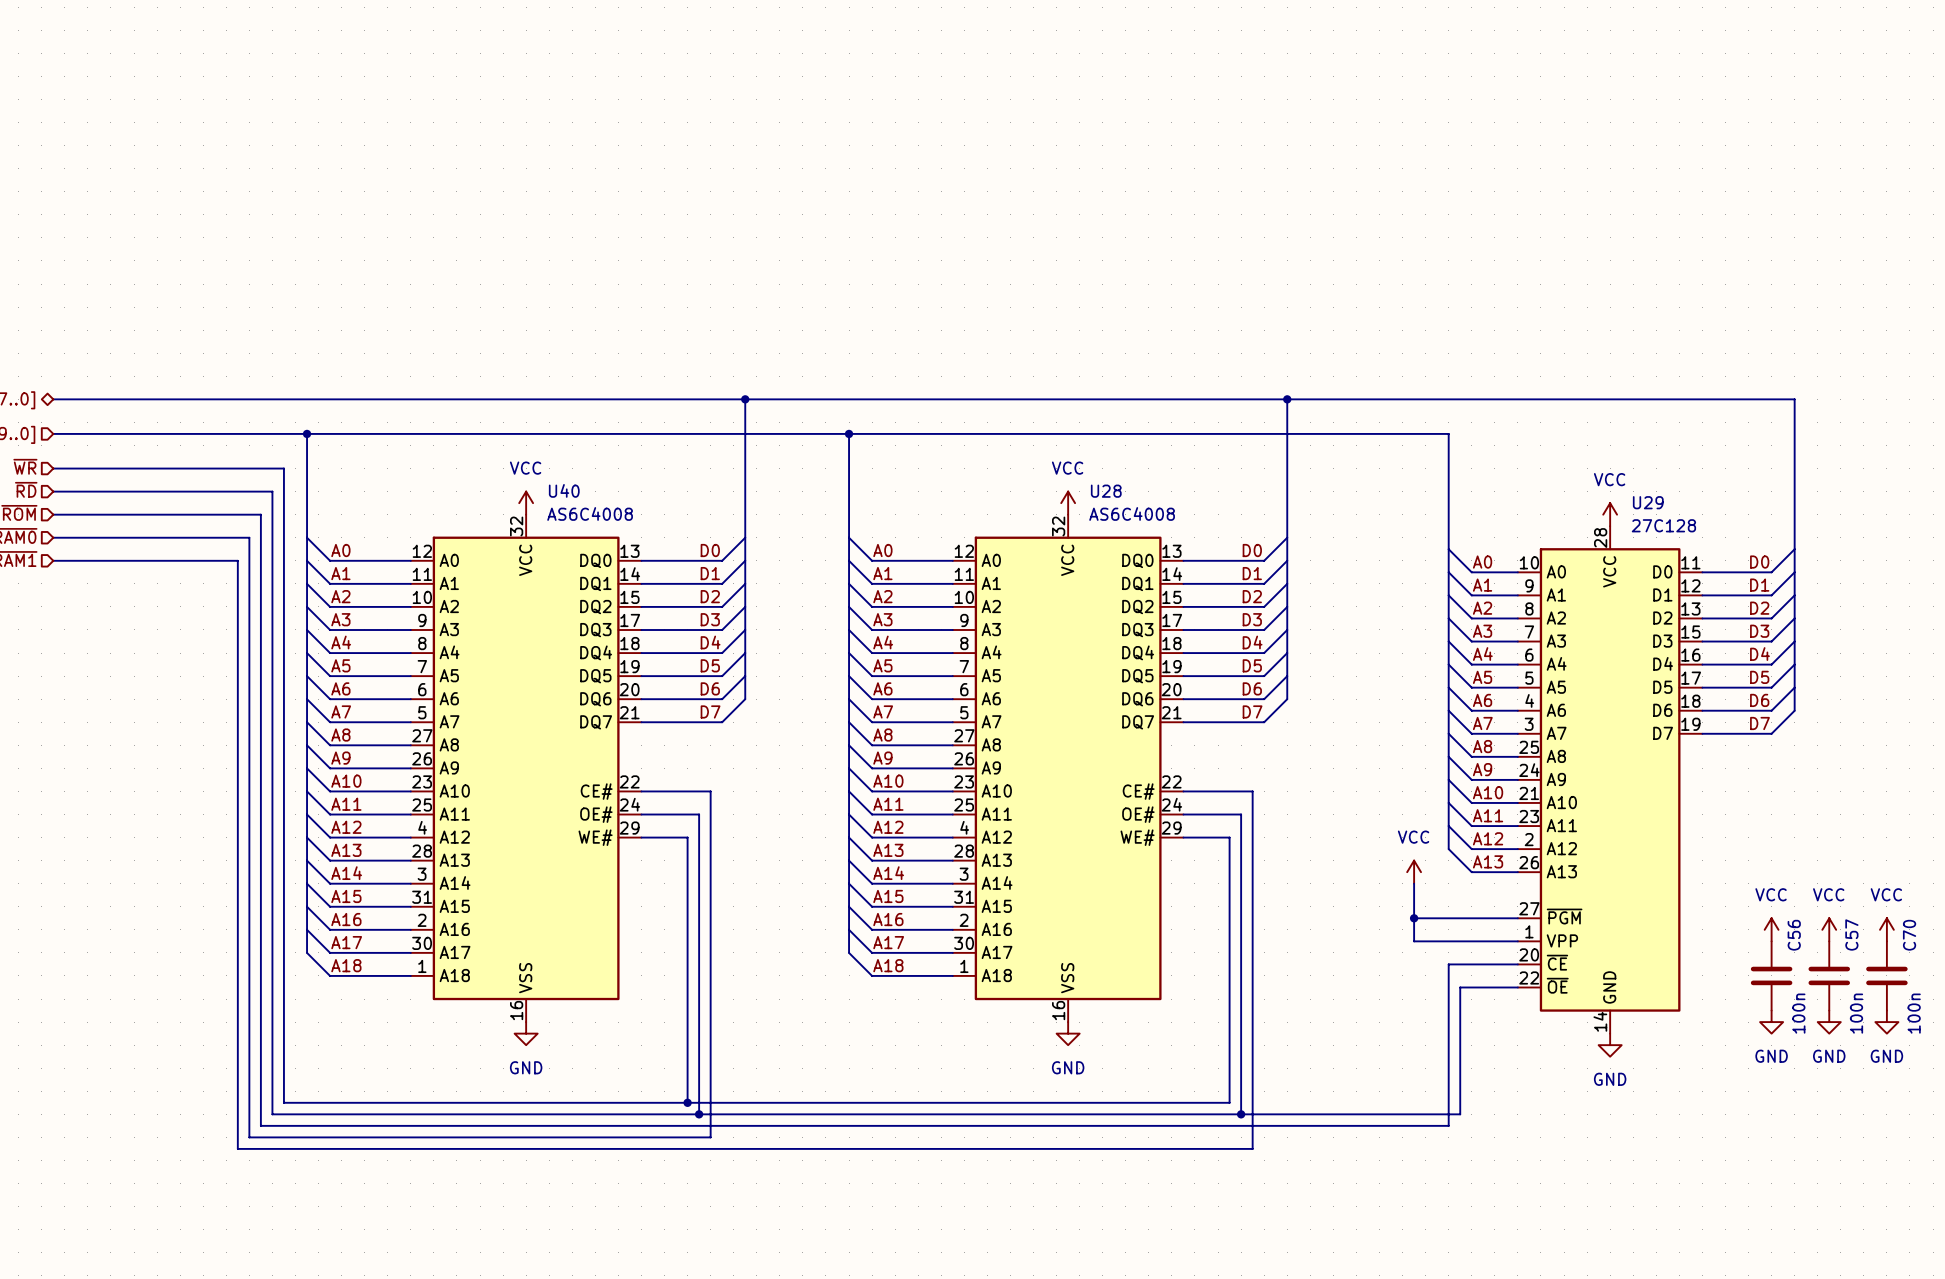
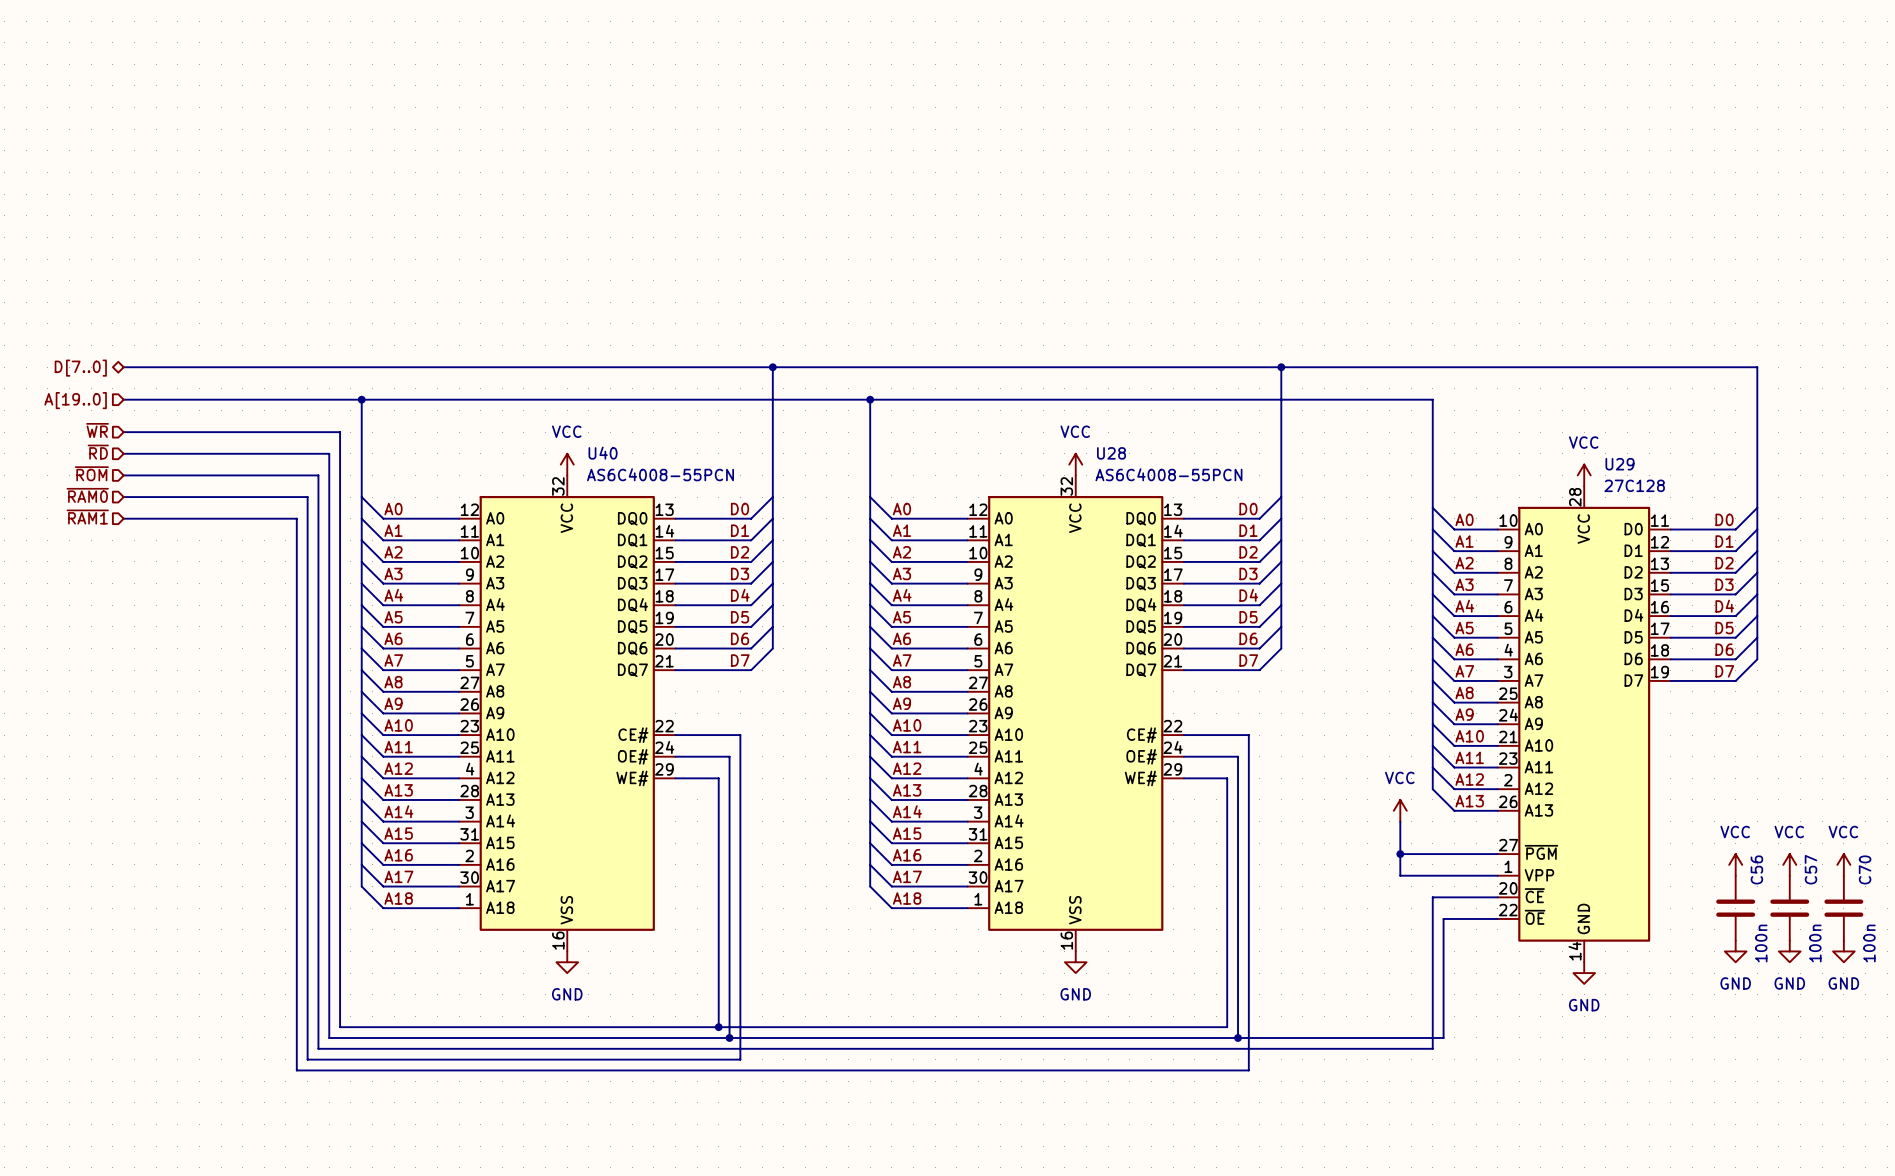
U40 value: AS6C4008 (590, 513) -> AS6C4008-55PCN (660, 474)
U28 value: AS6C4008 (1132, 513) -> AS6C4008-55PCN (1168, 474)

